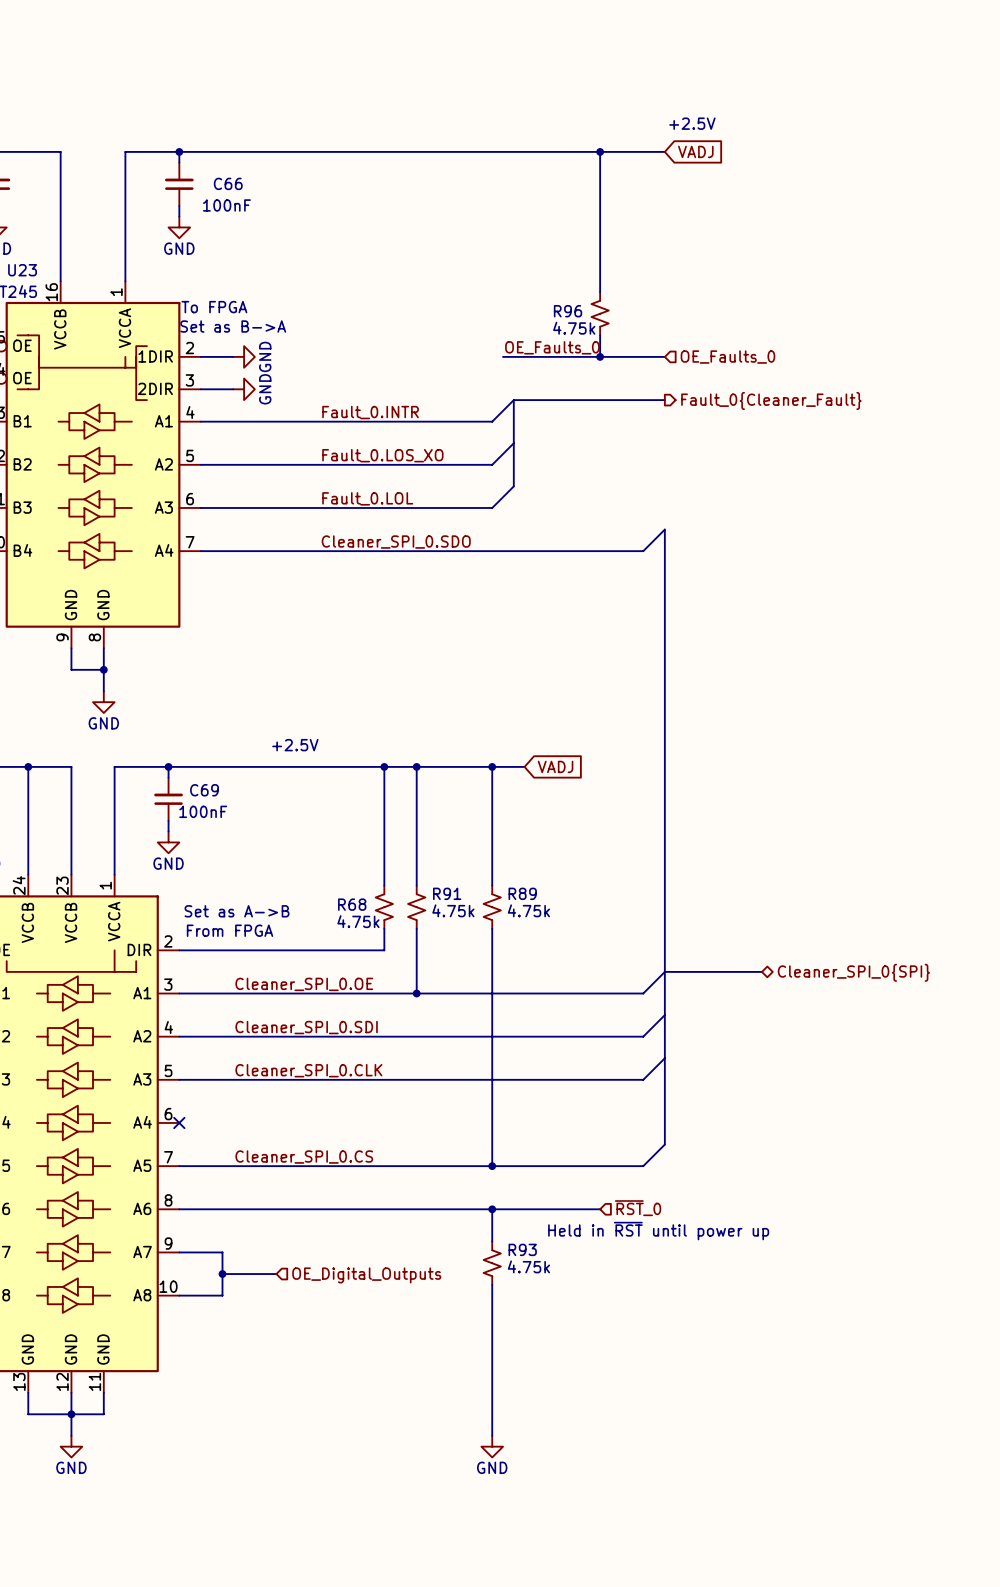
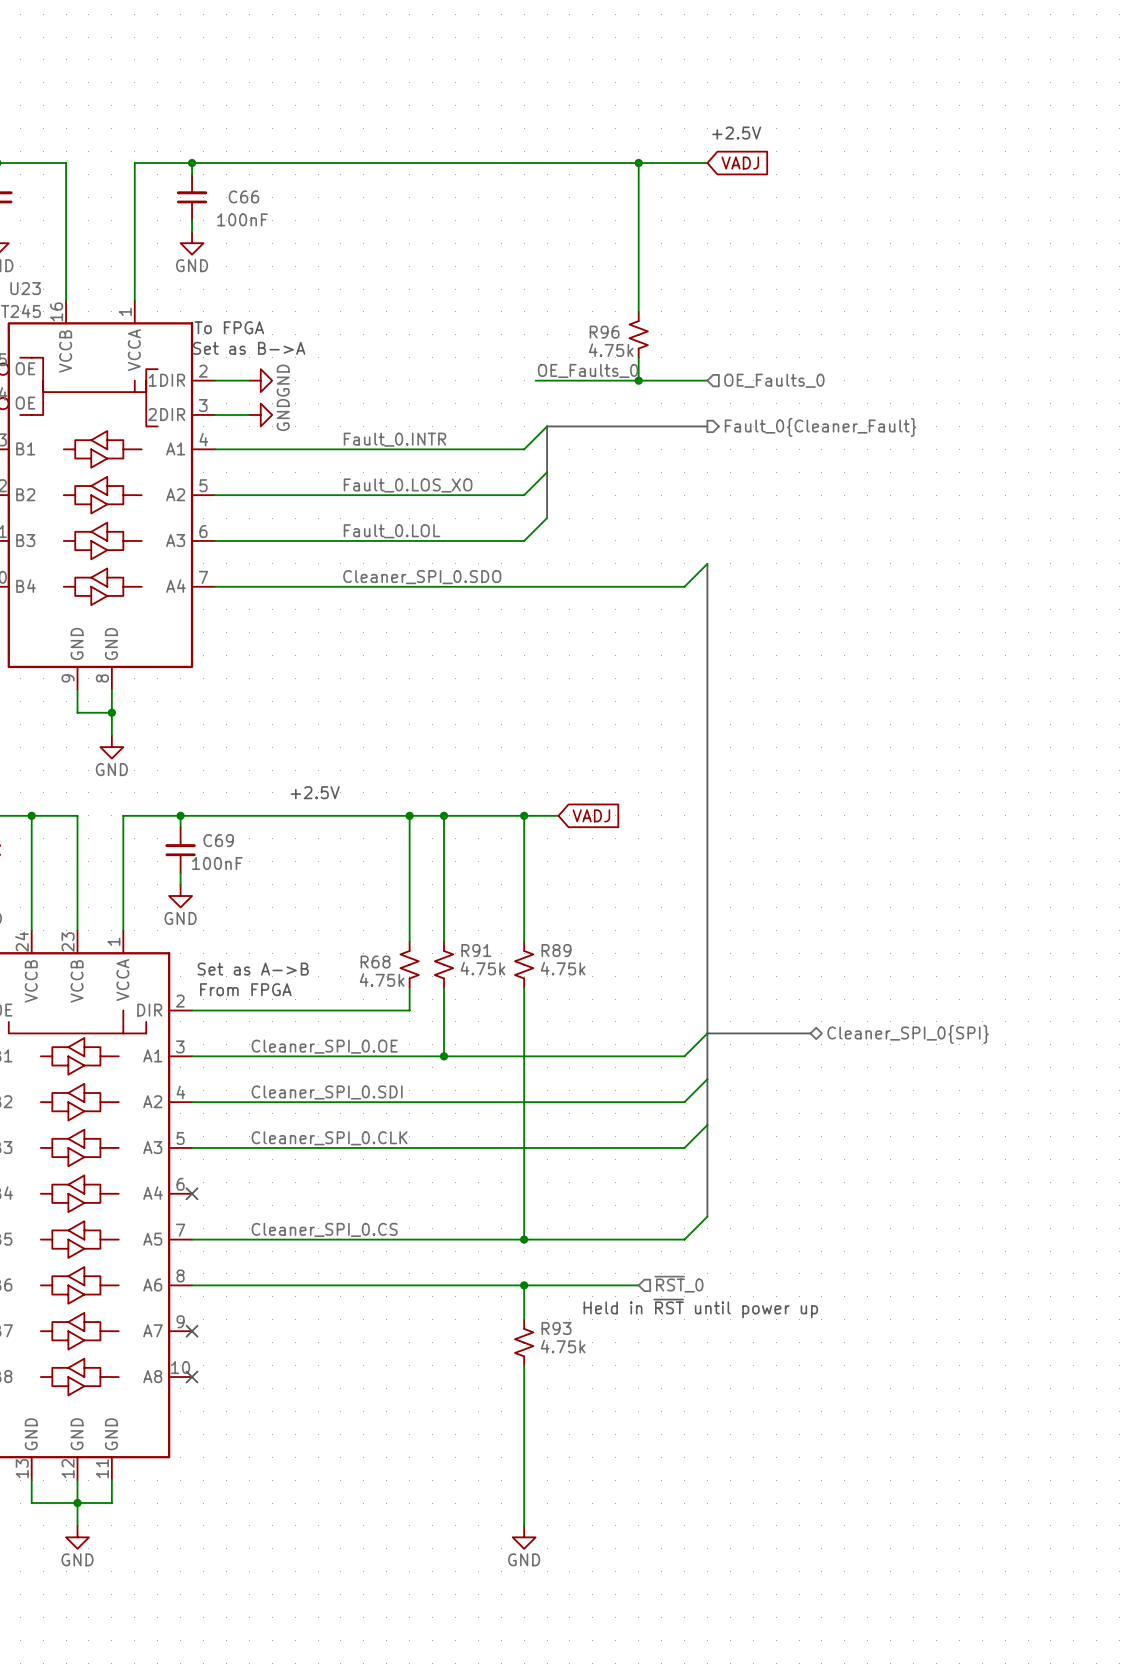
wire: (179, 1252) (222, 1252) (222, 1295) (179, 1295) -> none
no-connect mark: none -> (192, 1331)
wire: (222, 1274) (276, 1274) -> none
junction: (222, 1274) -> none
hierarchical label: OE_Digital_Outputs (366, 1275) -> none
no-connect mark: none -> (192, 1377)

